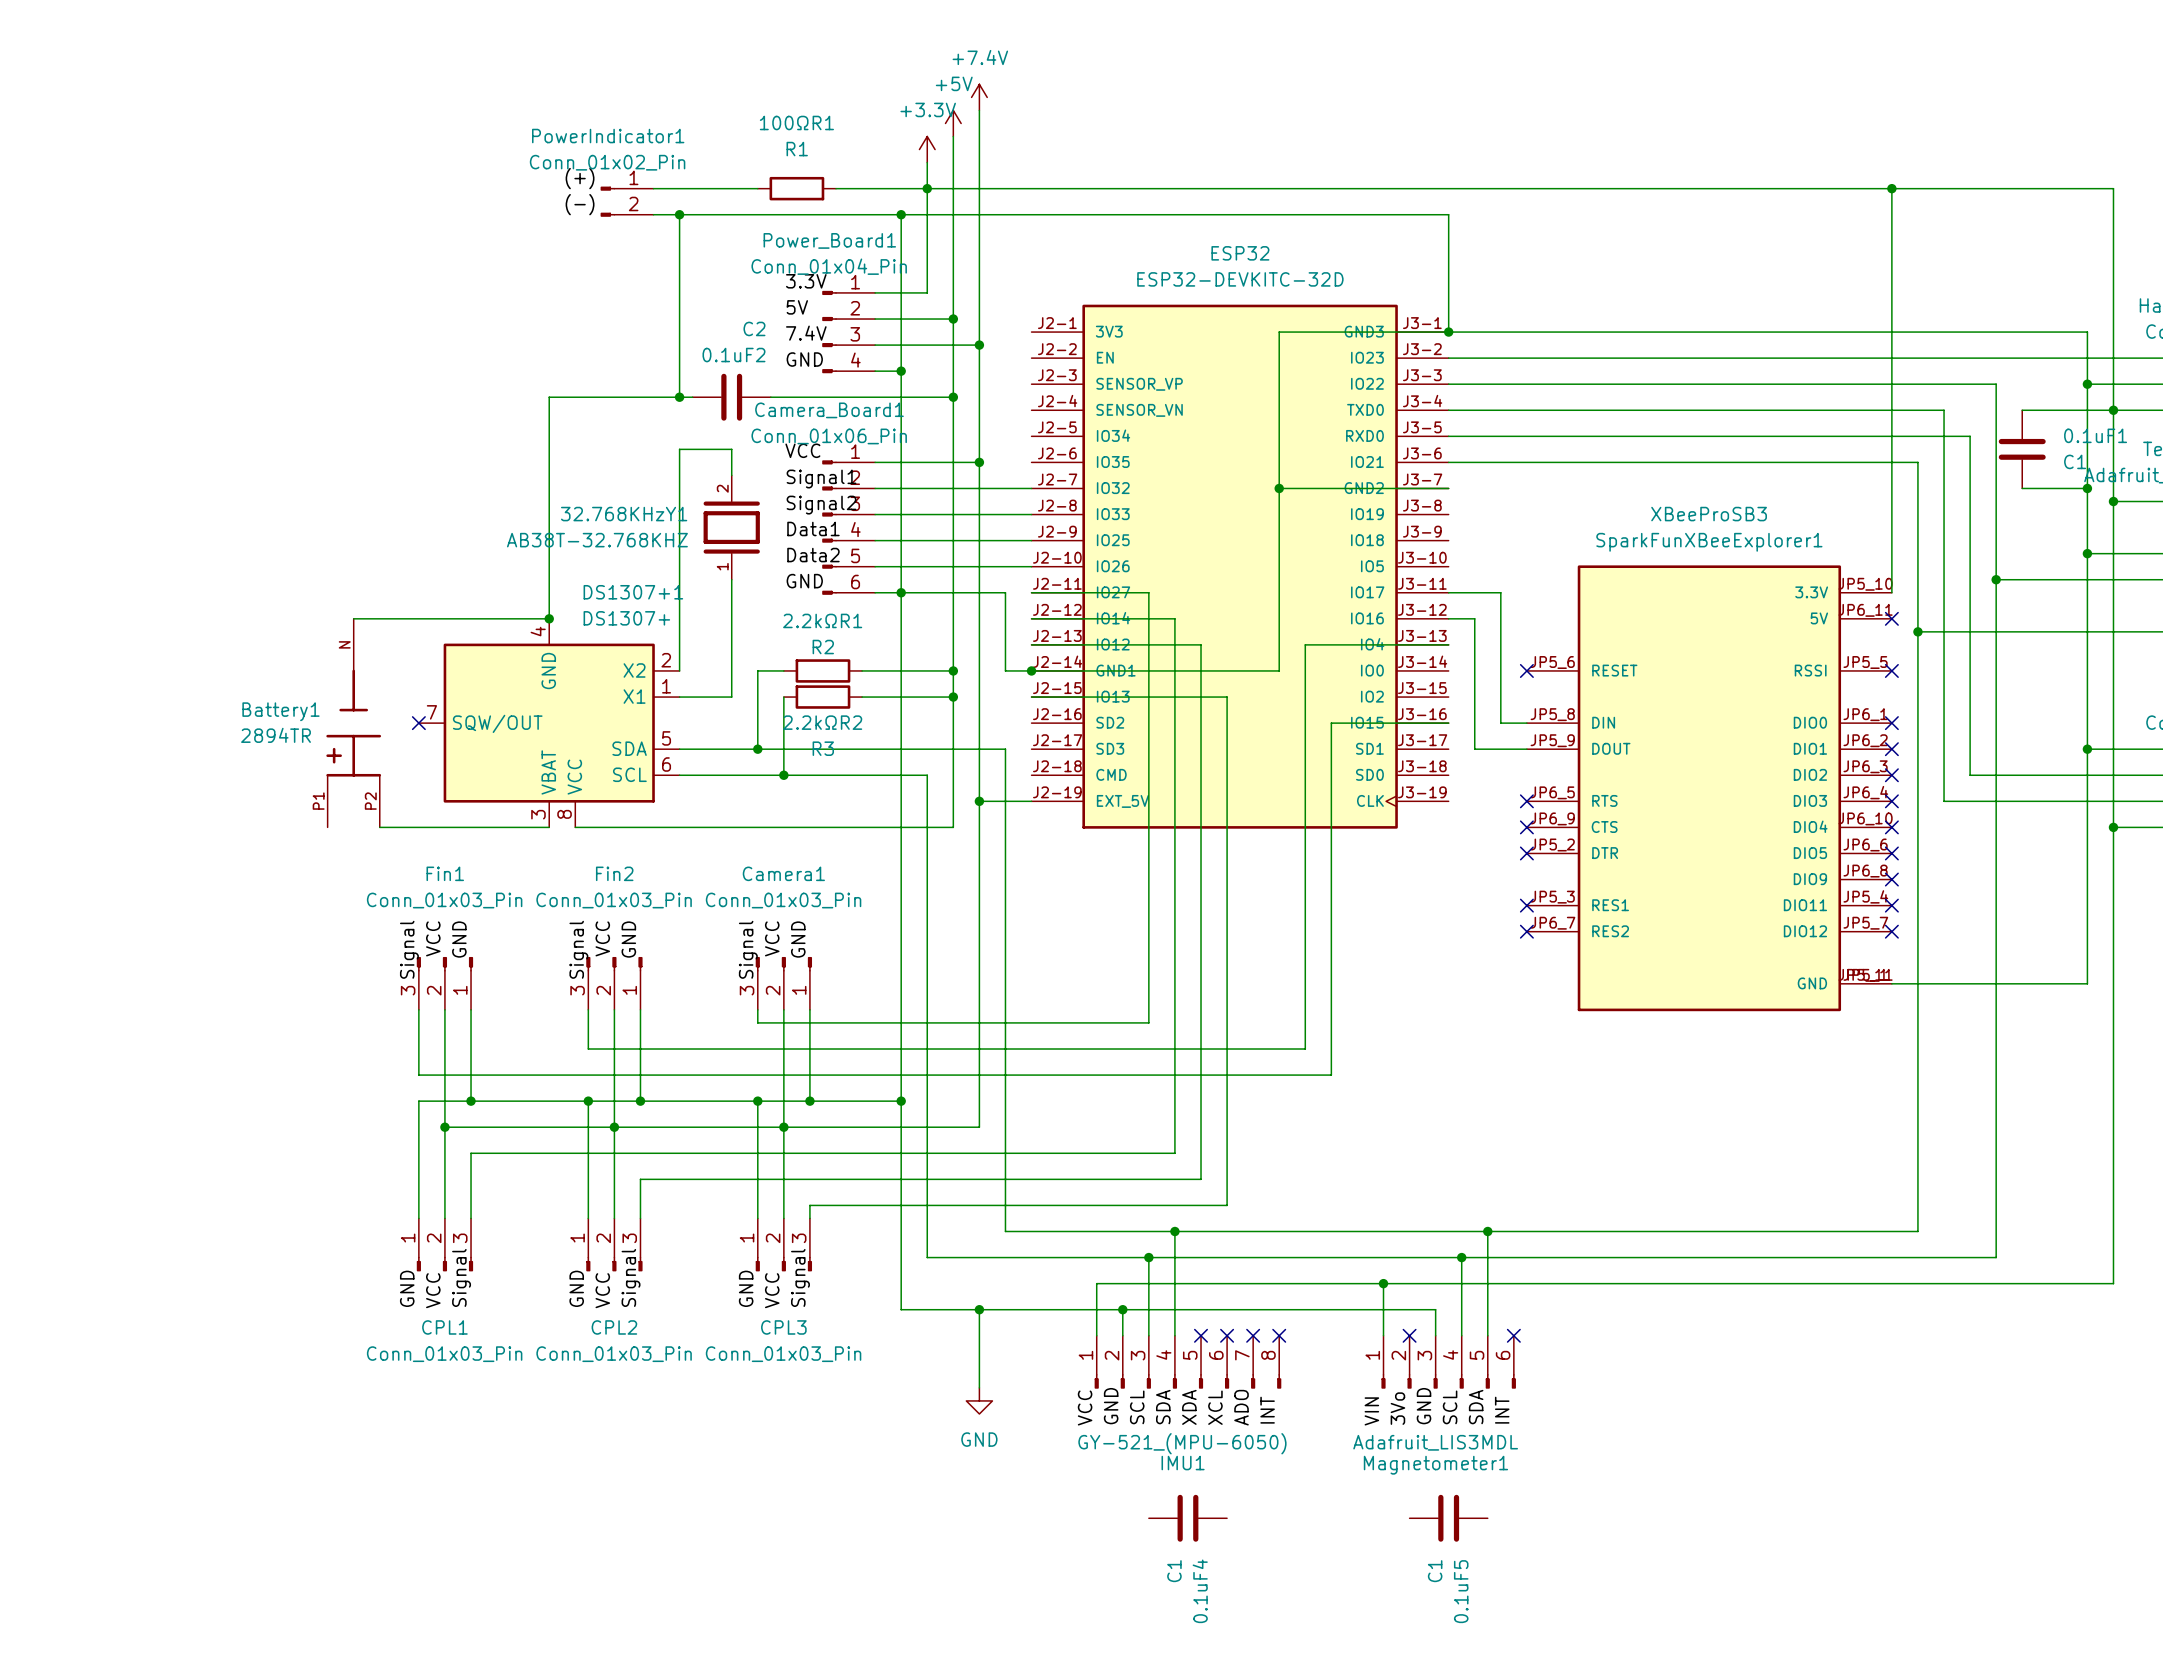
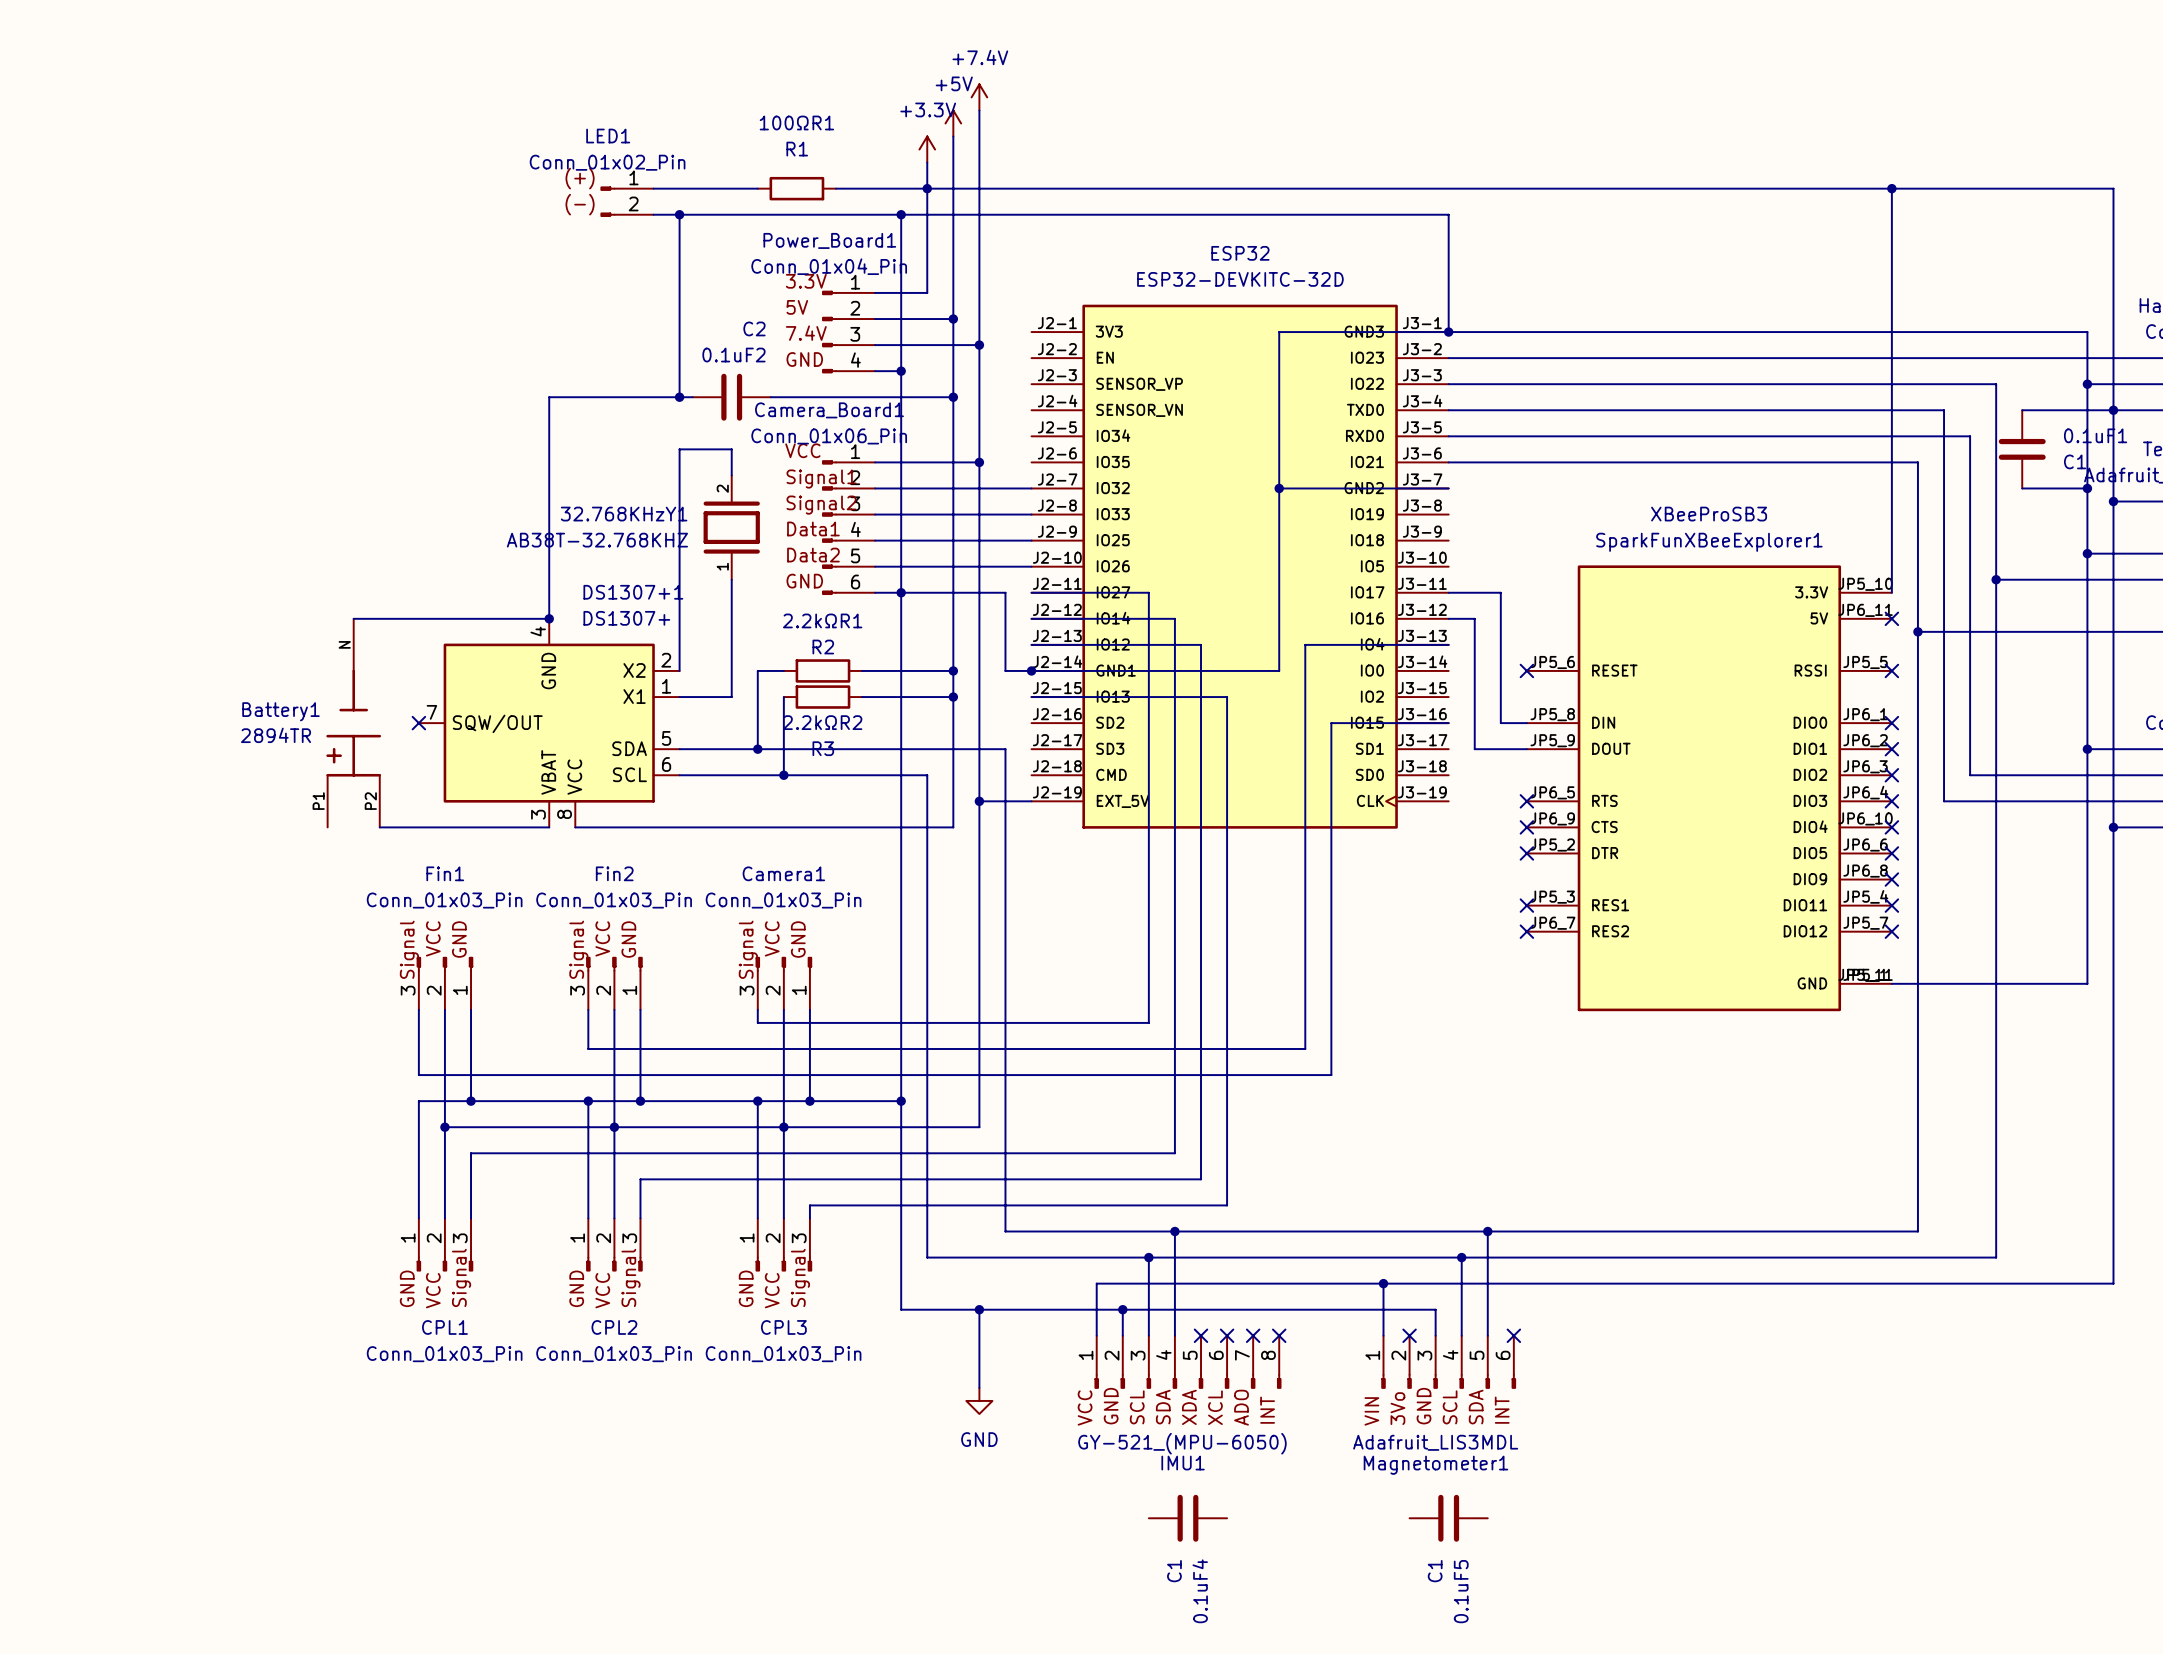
PowerIndicator1 name: PowerIndicator1 (608, 136) -> LED1 (608, 136)

